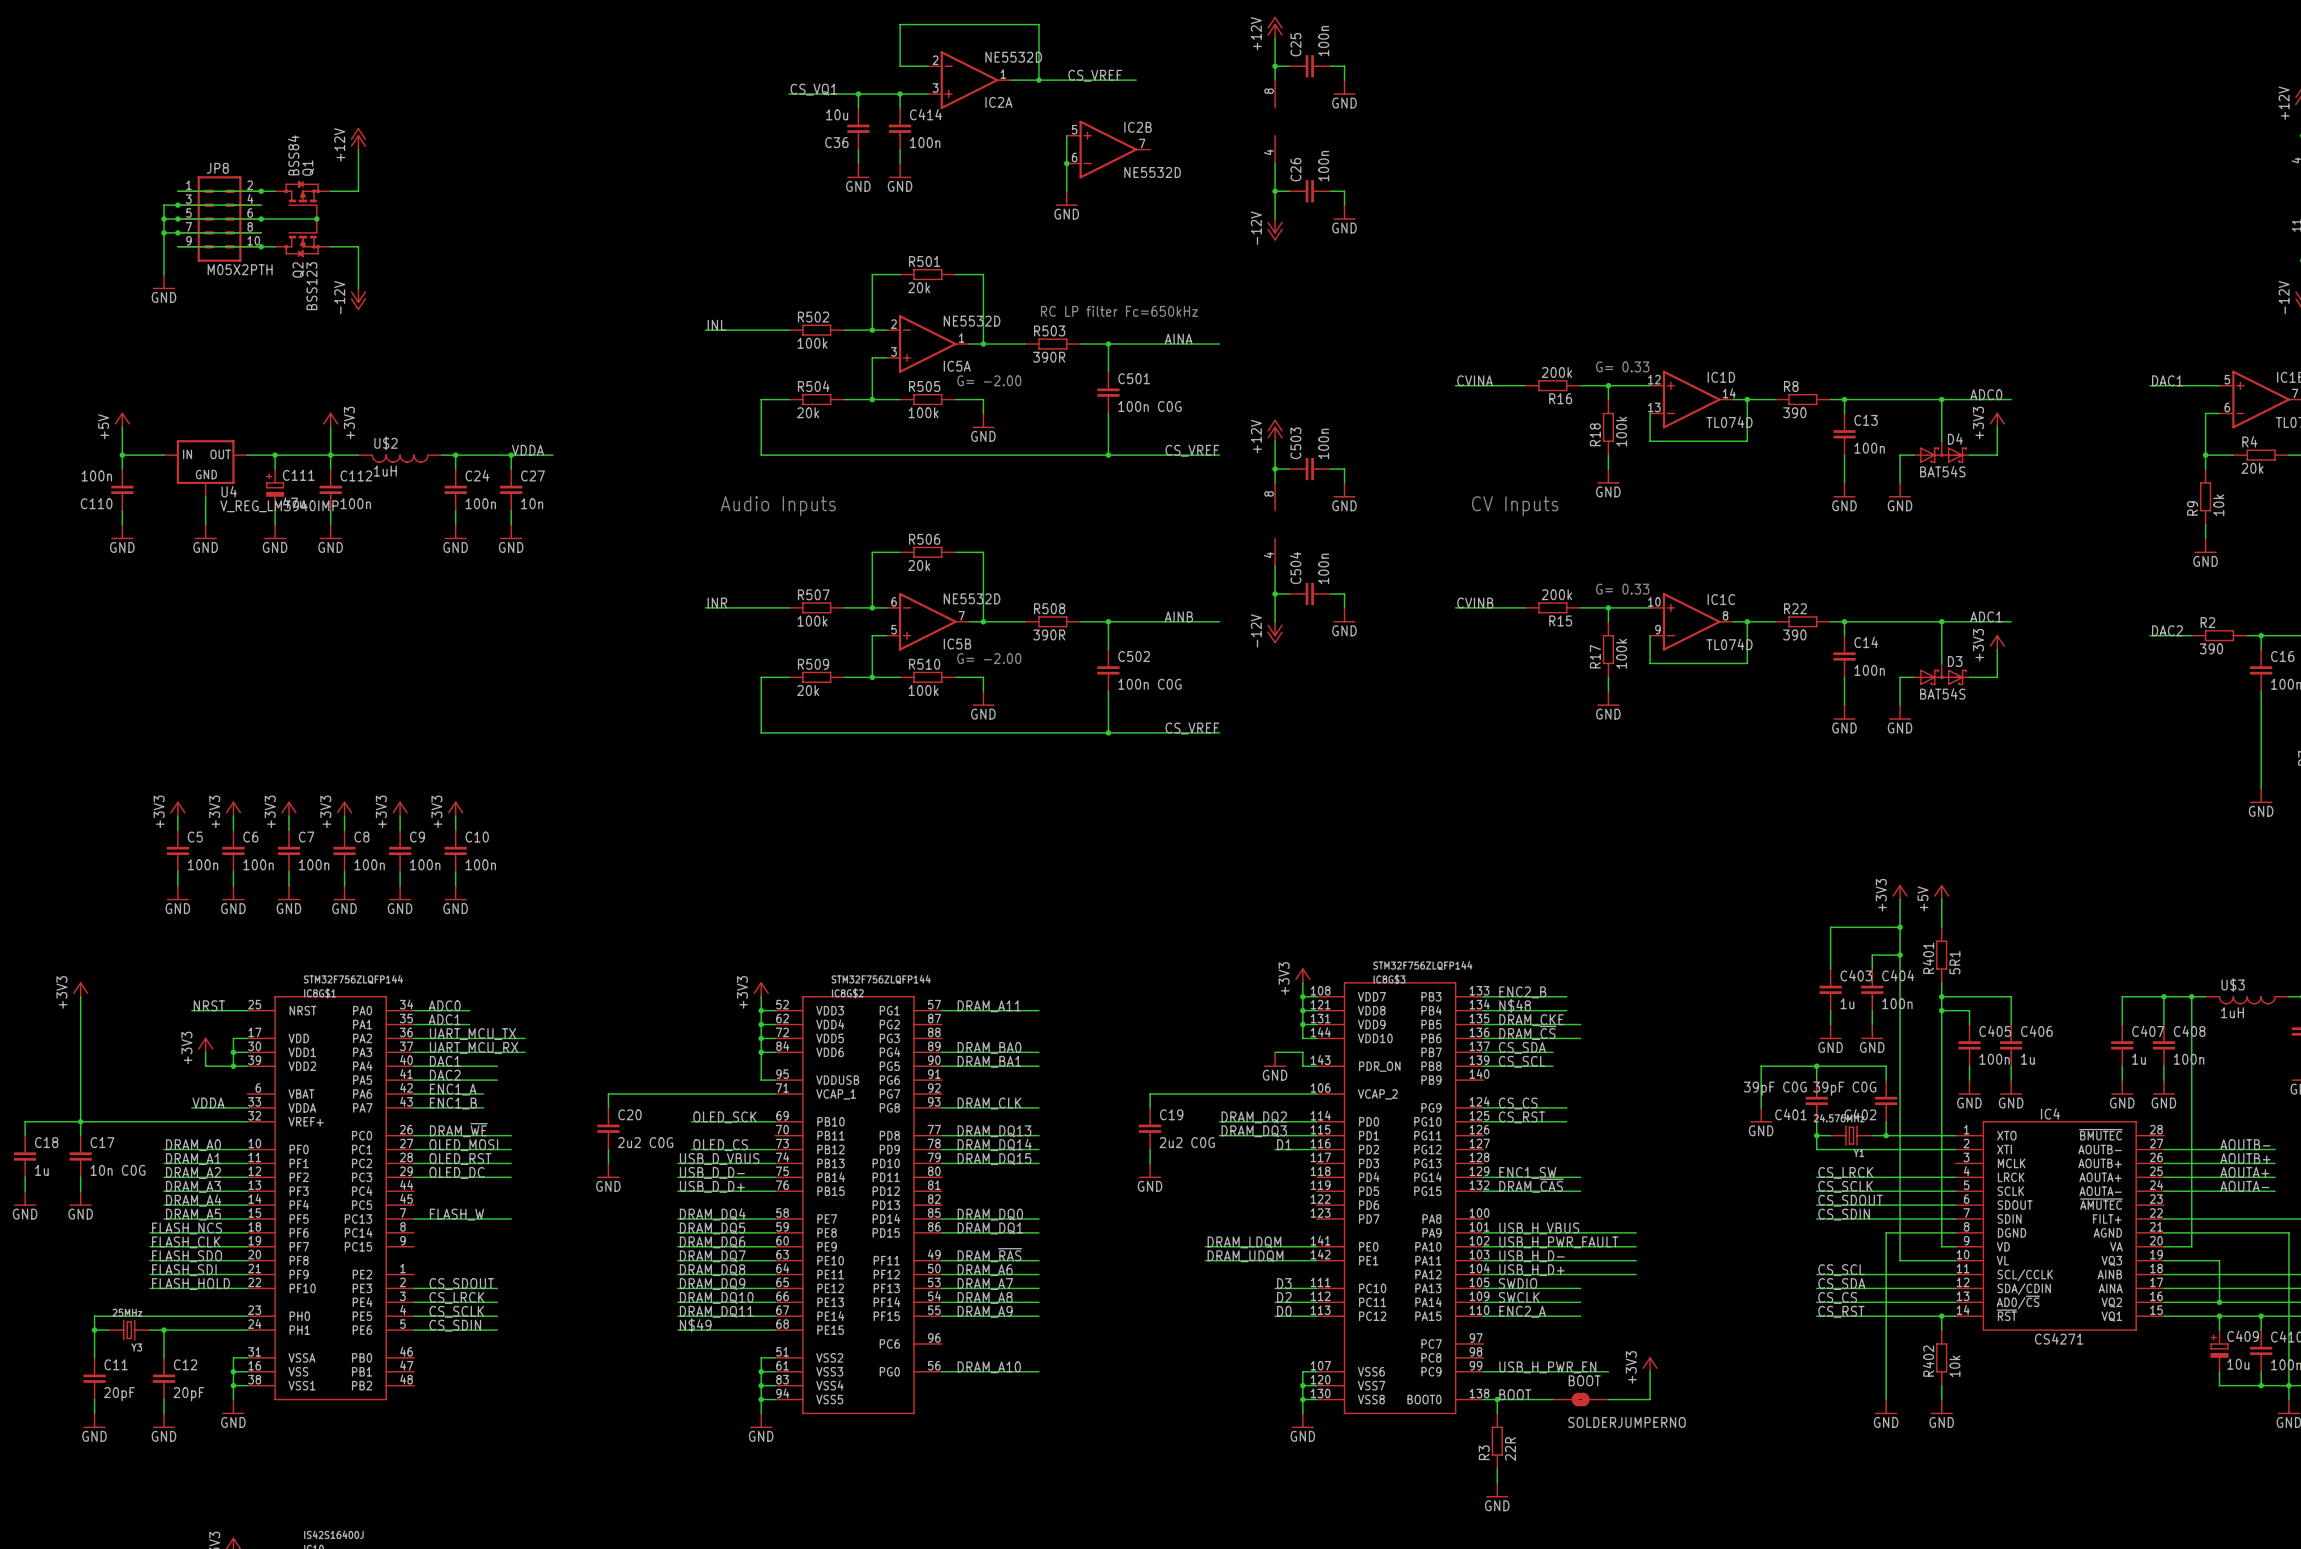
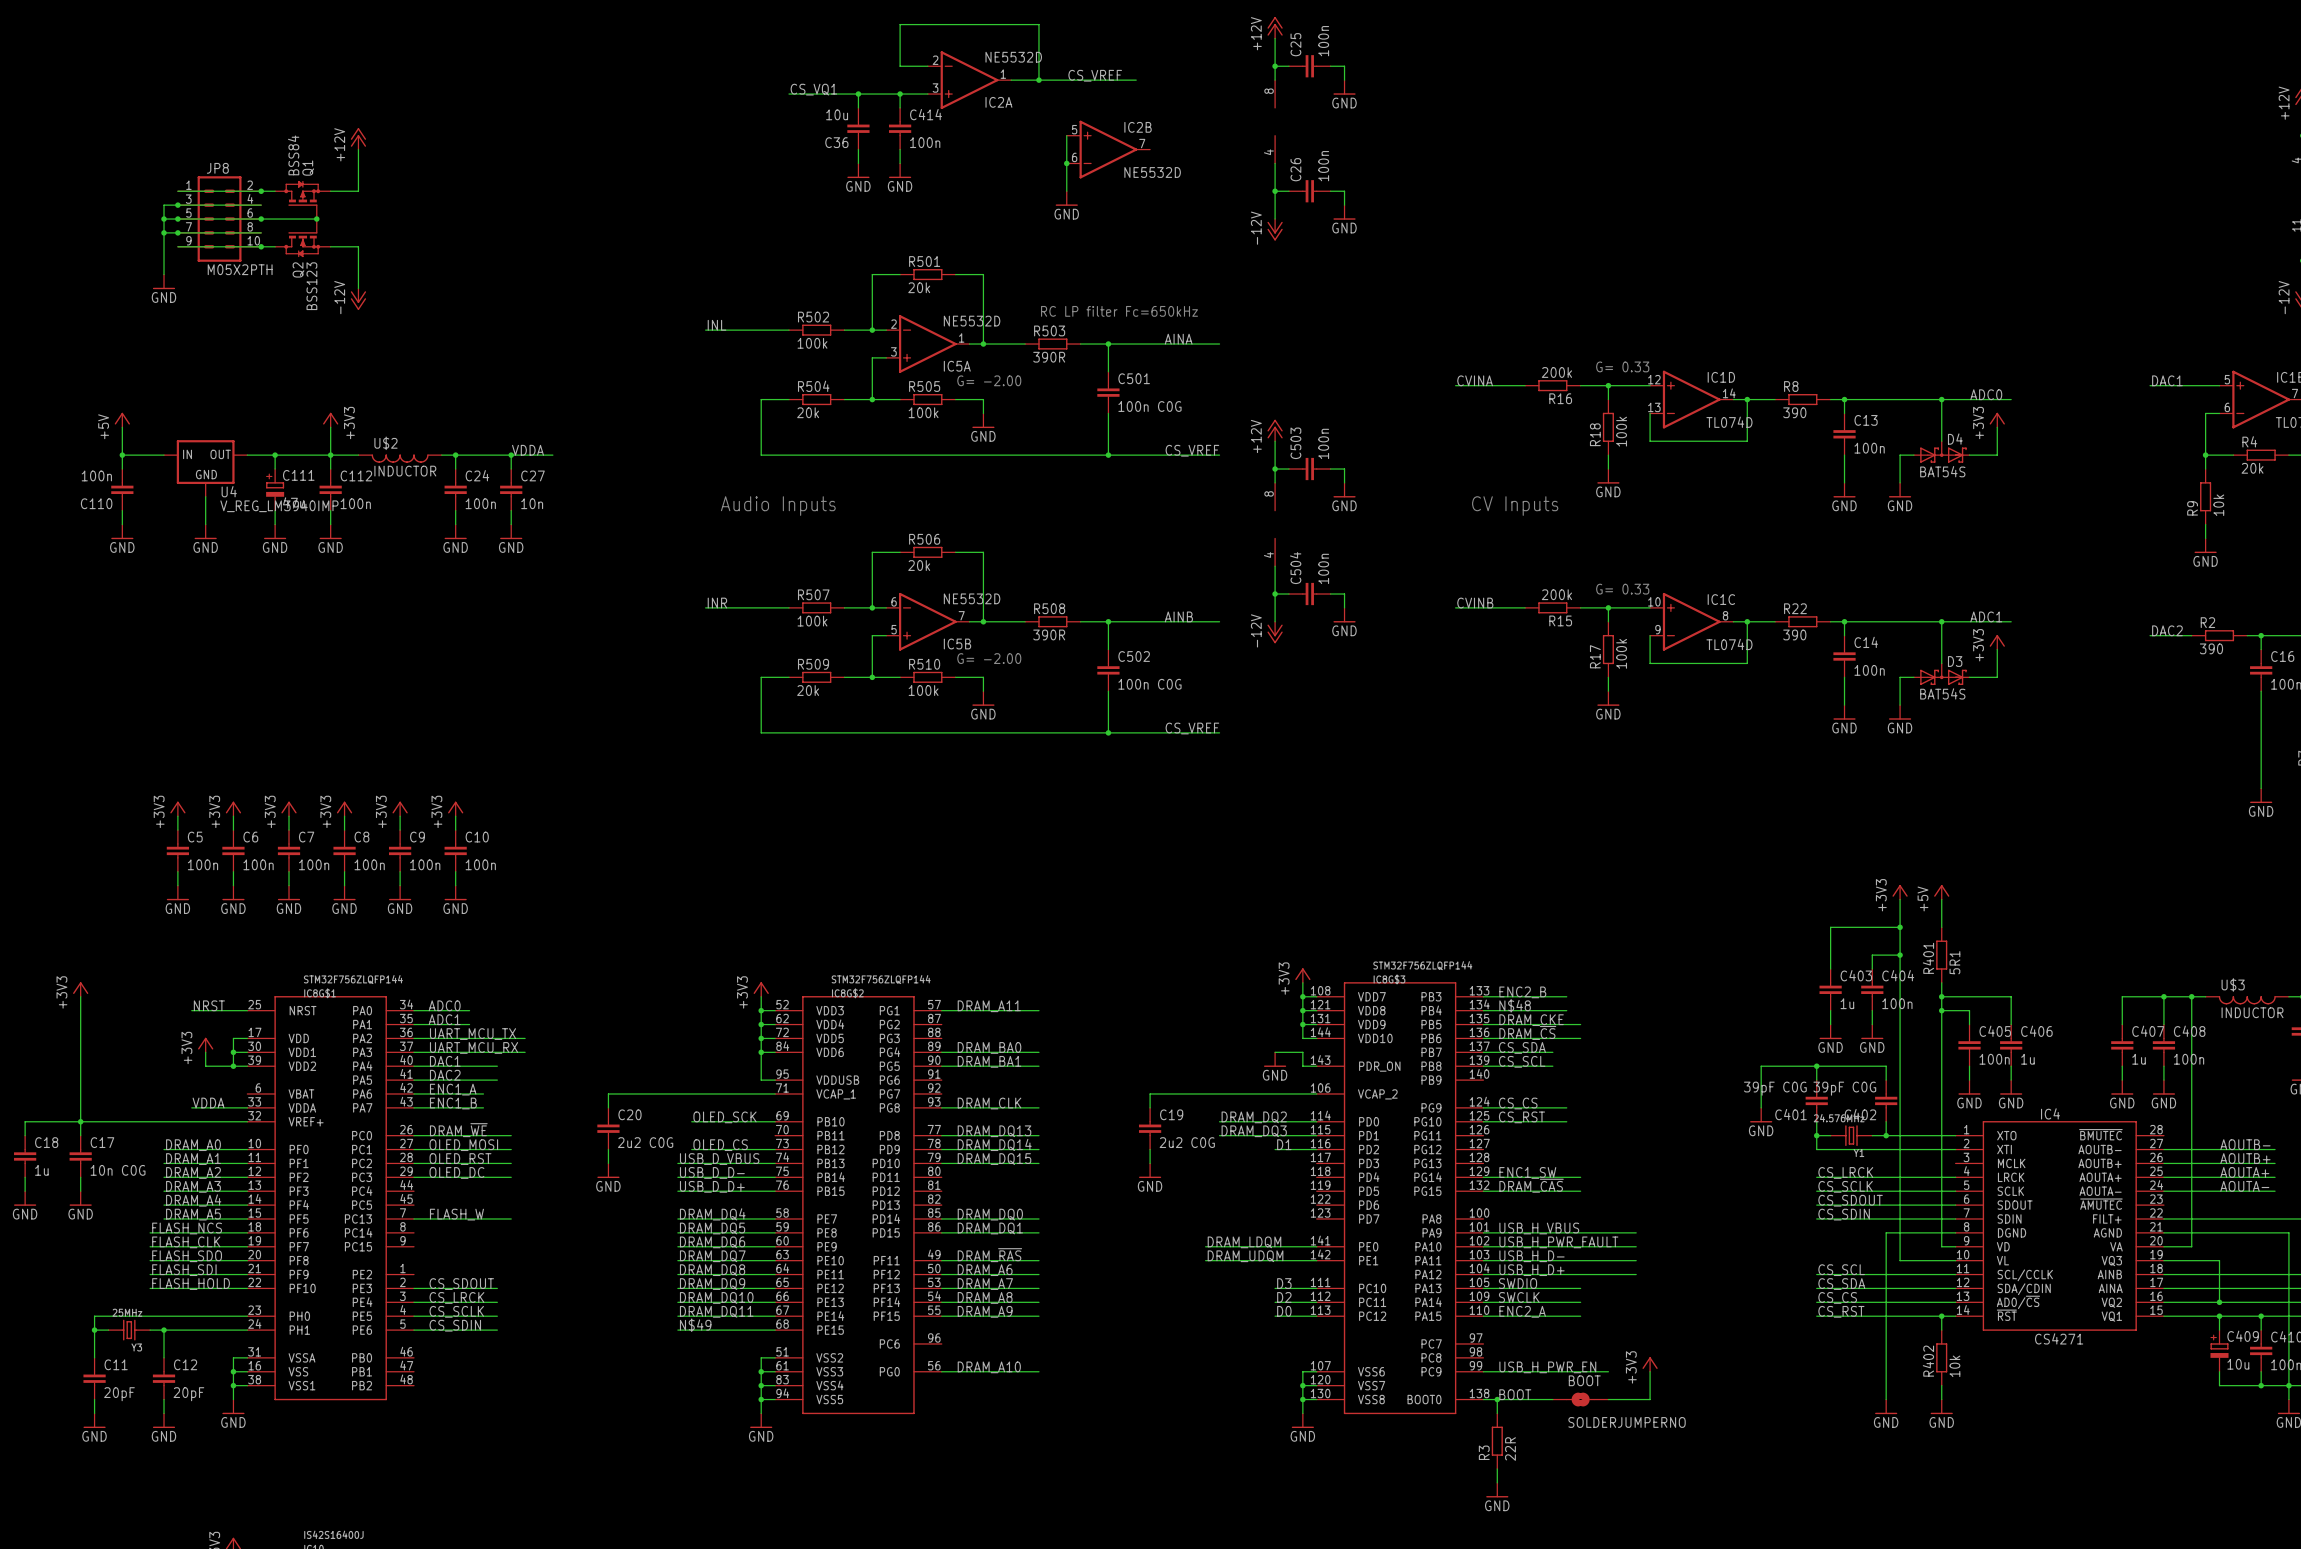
U$2 value: 1uH (385, 471) -> INDUCTOR (405, 471)
U$3 value: 1uH (2232, 1012) -> INDUCTOR (2252, 1012)

